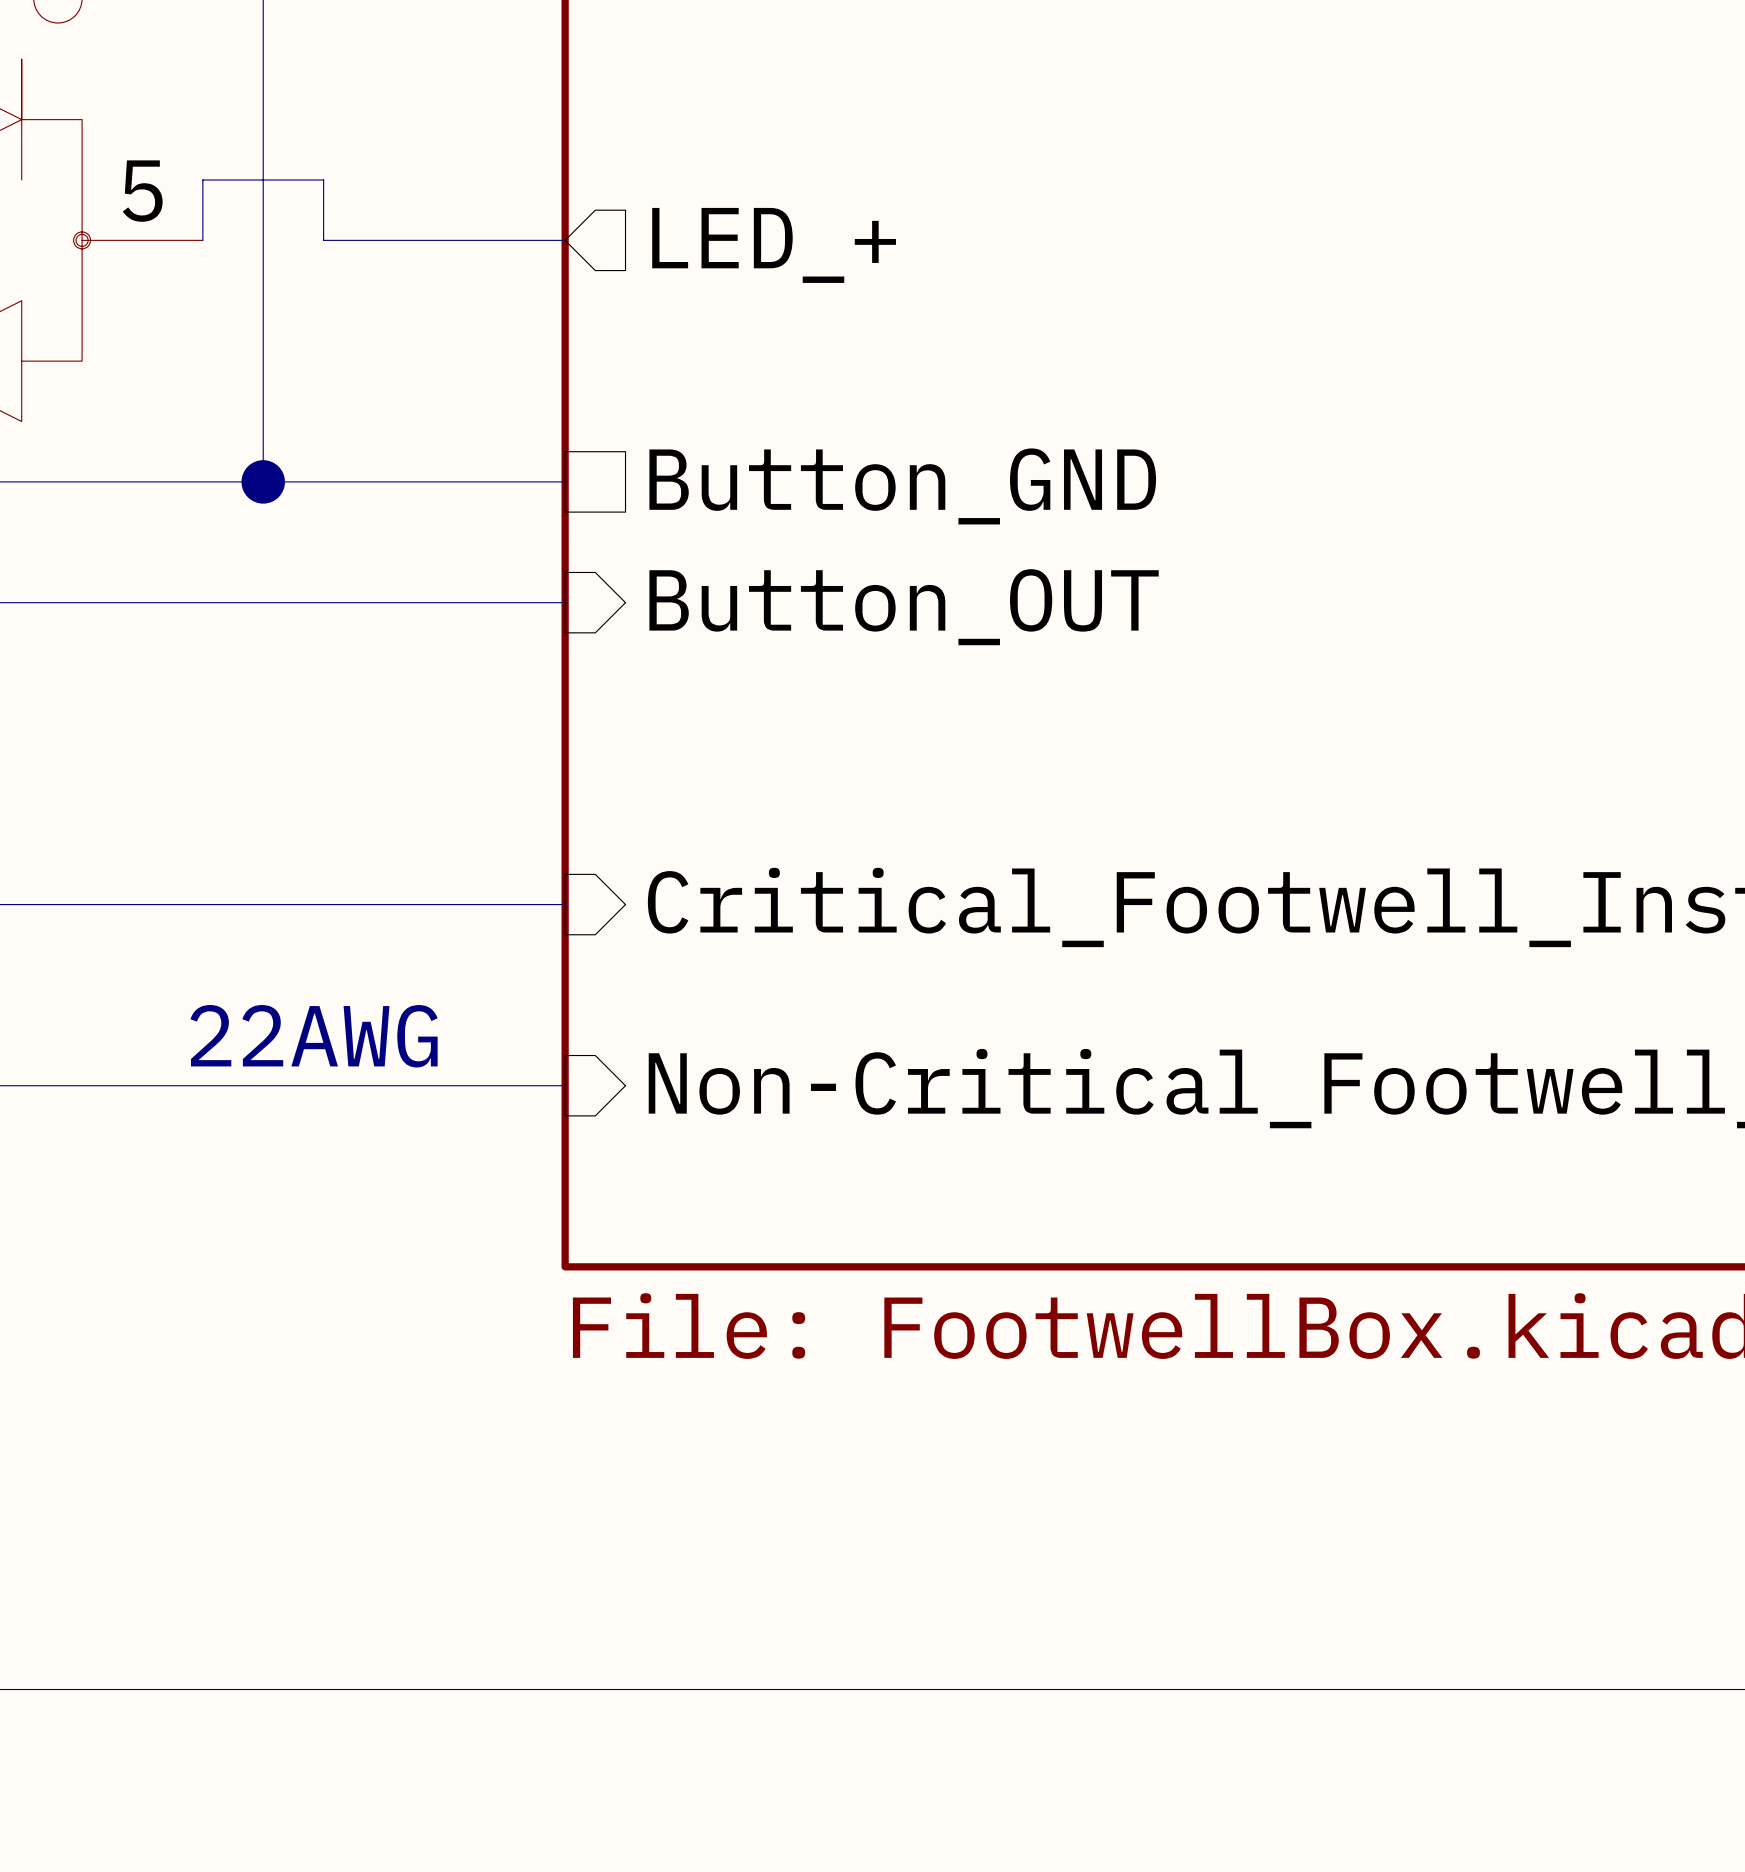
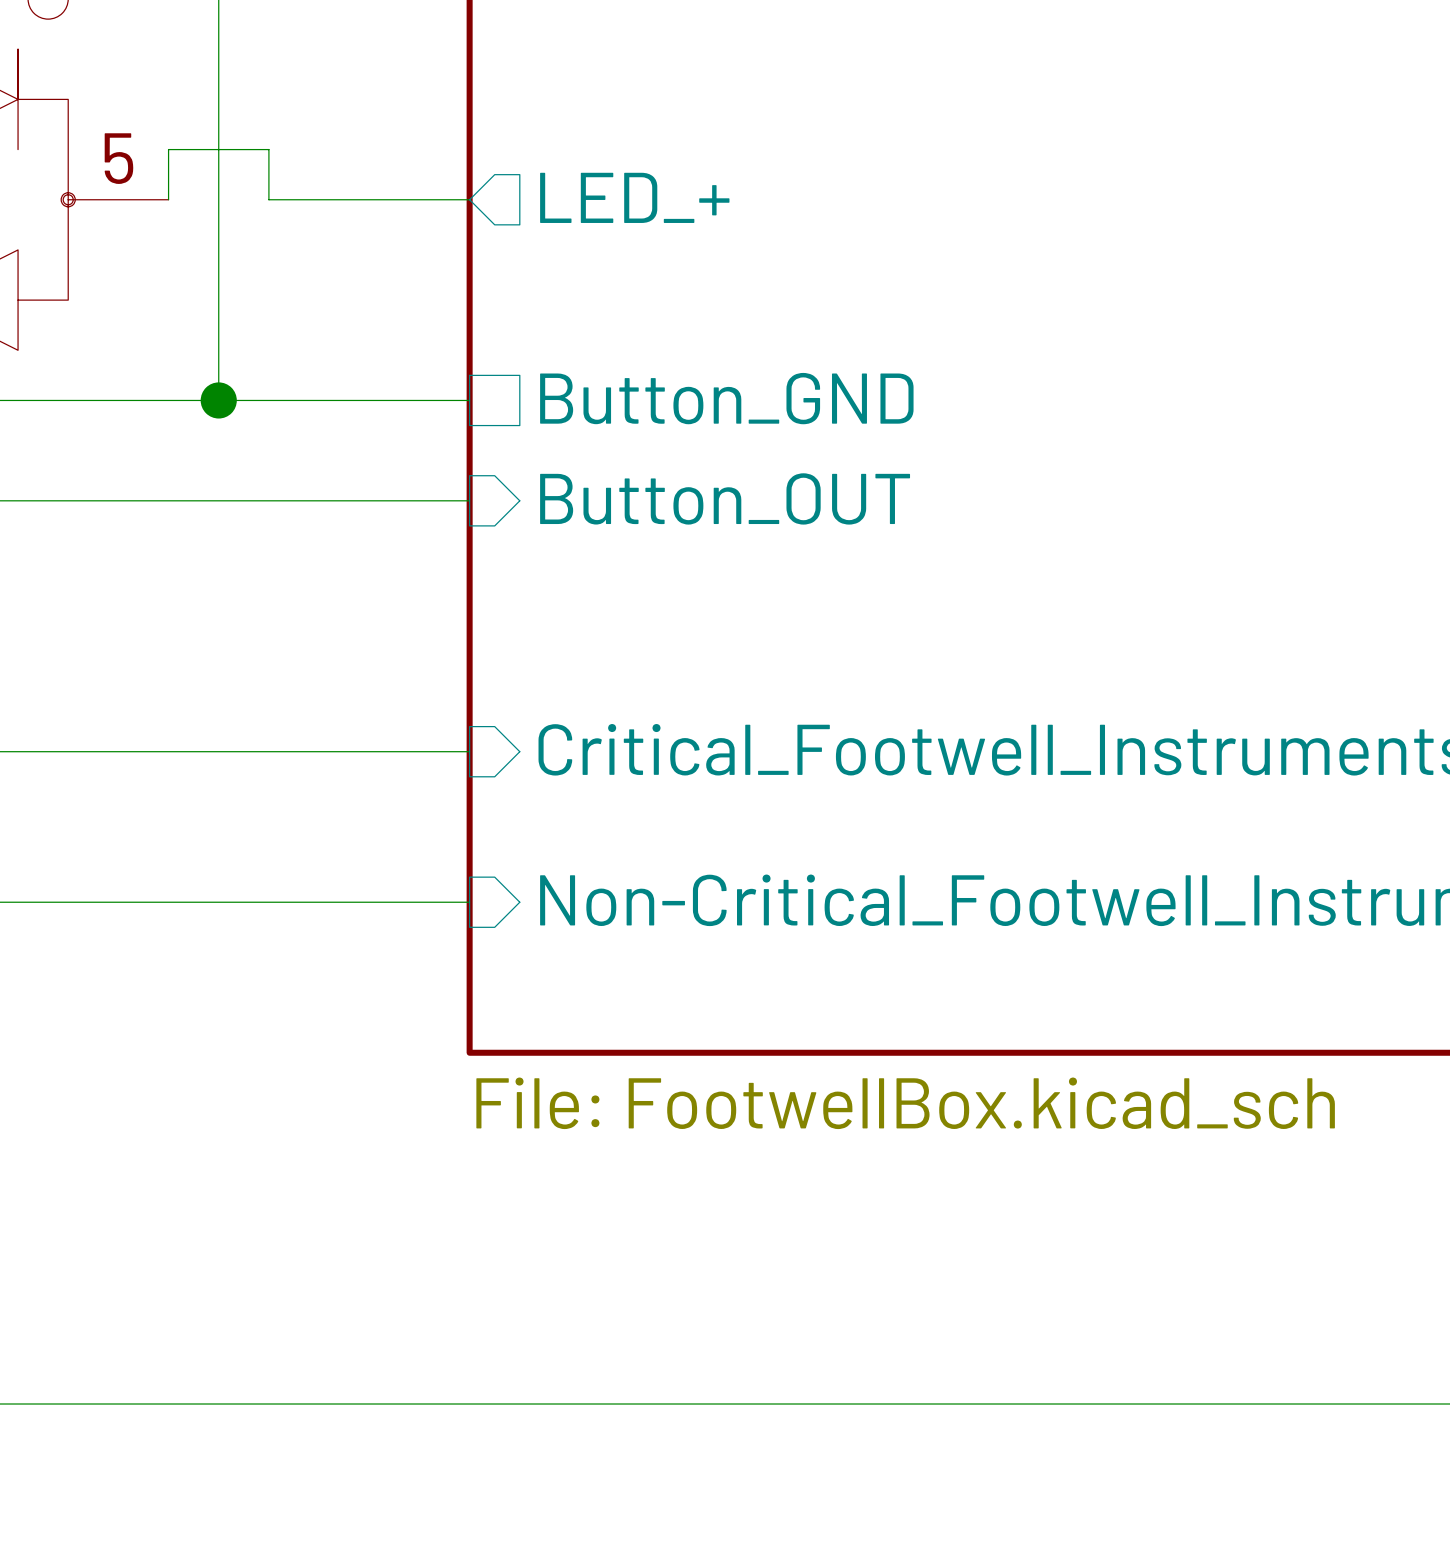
text: 22AWG (314, 1036) -> none

